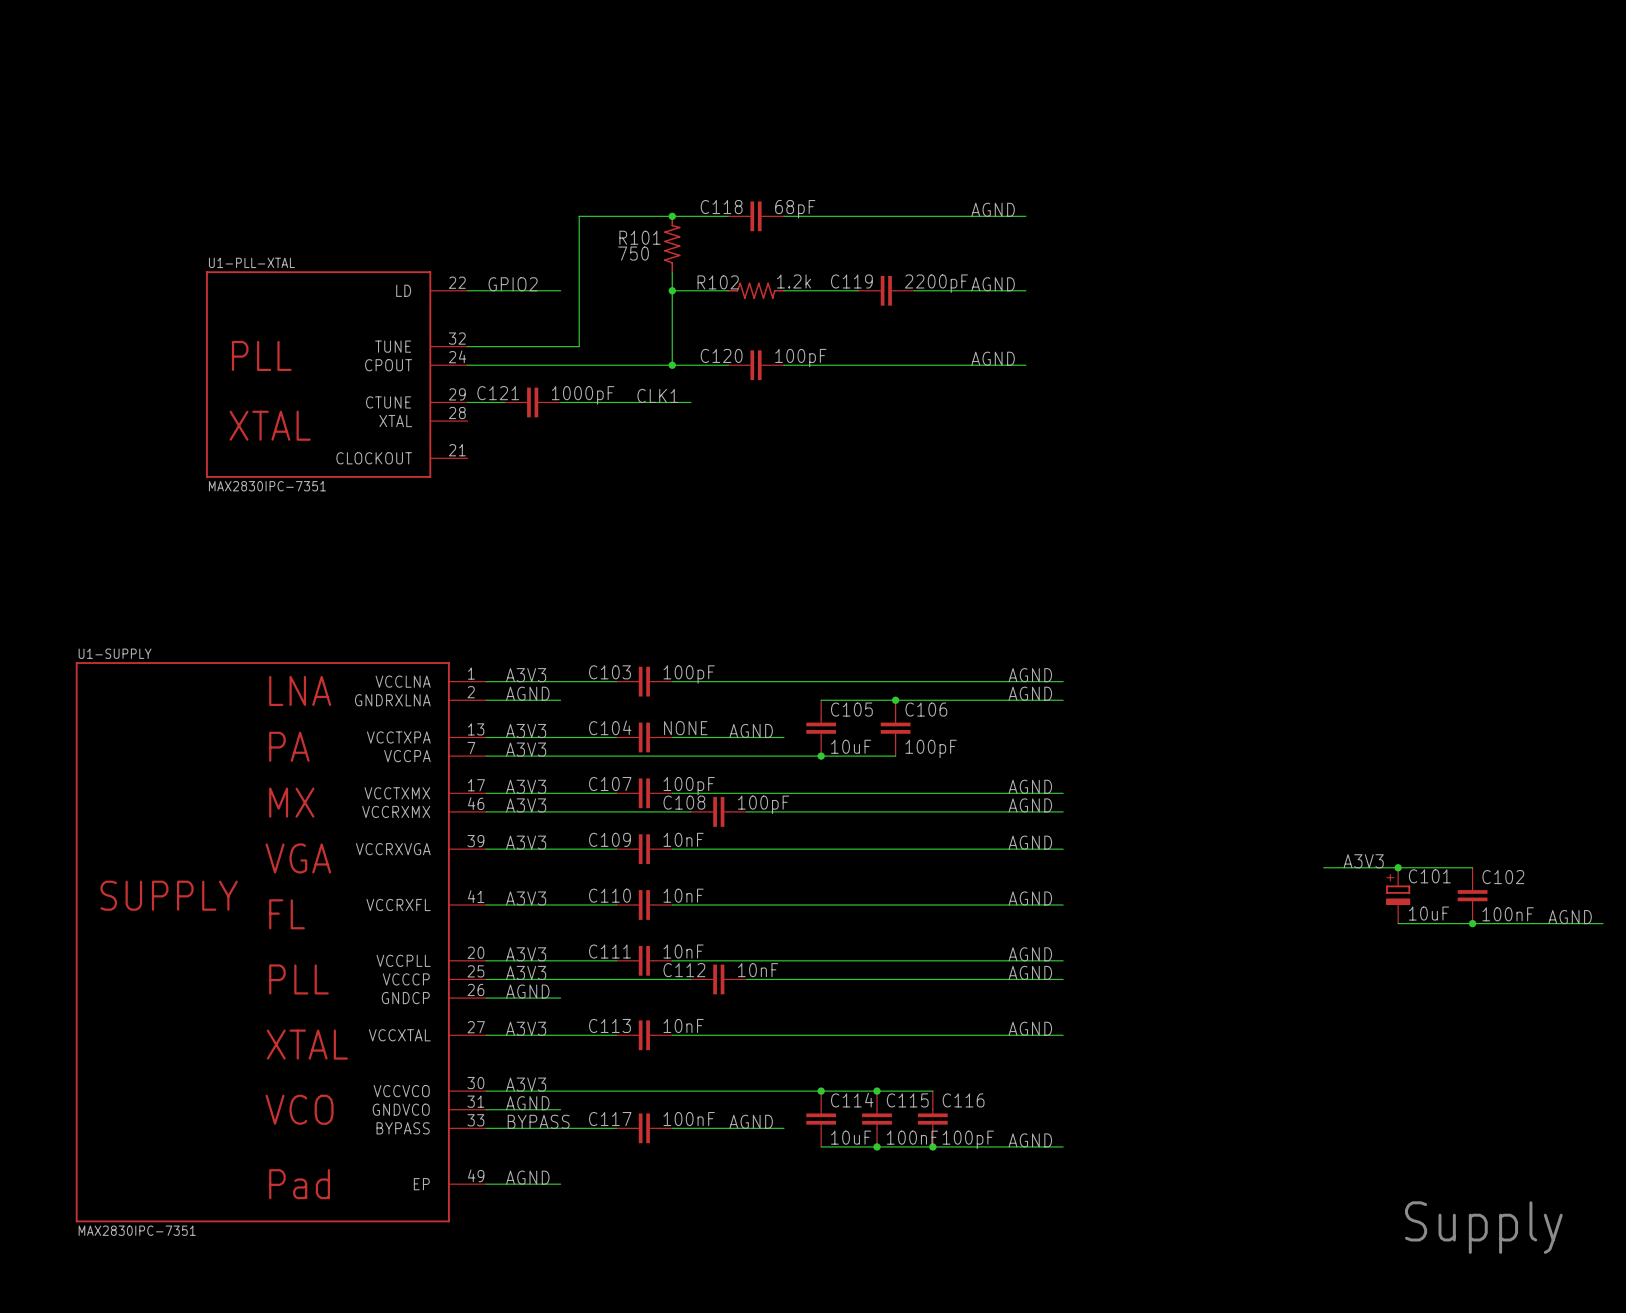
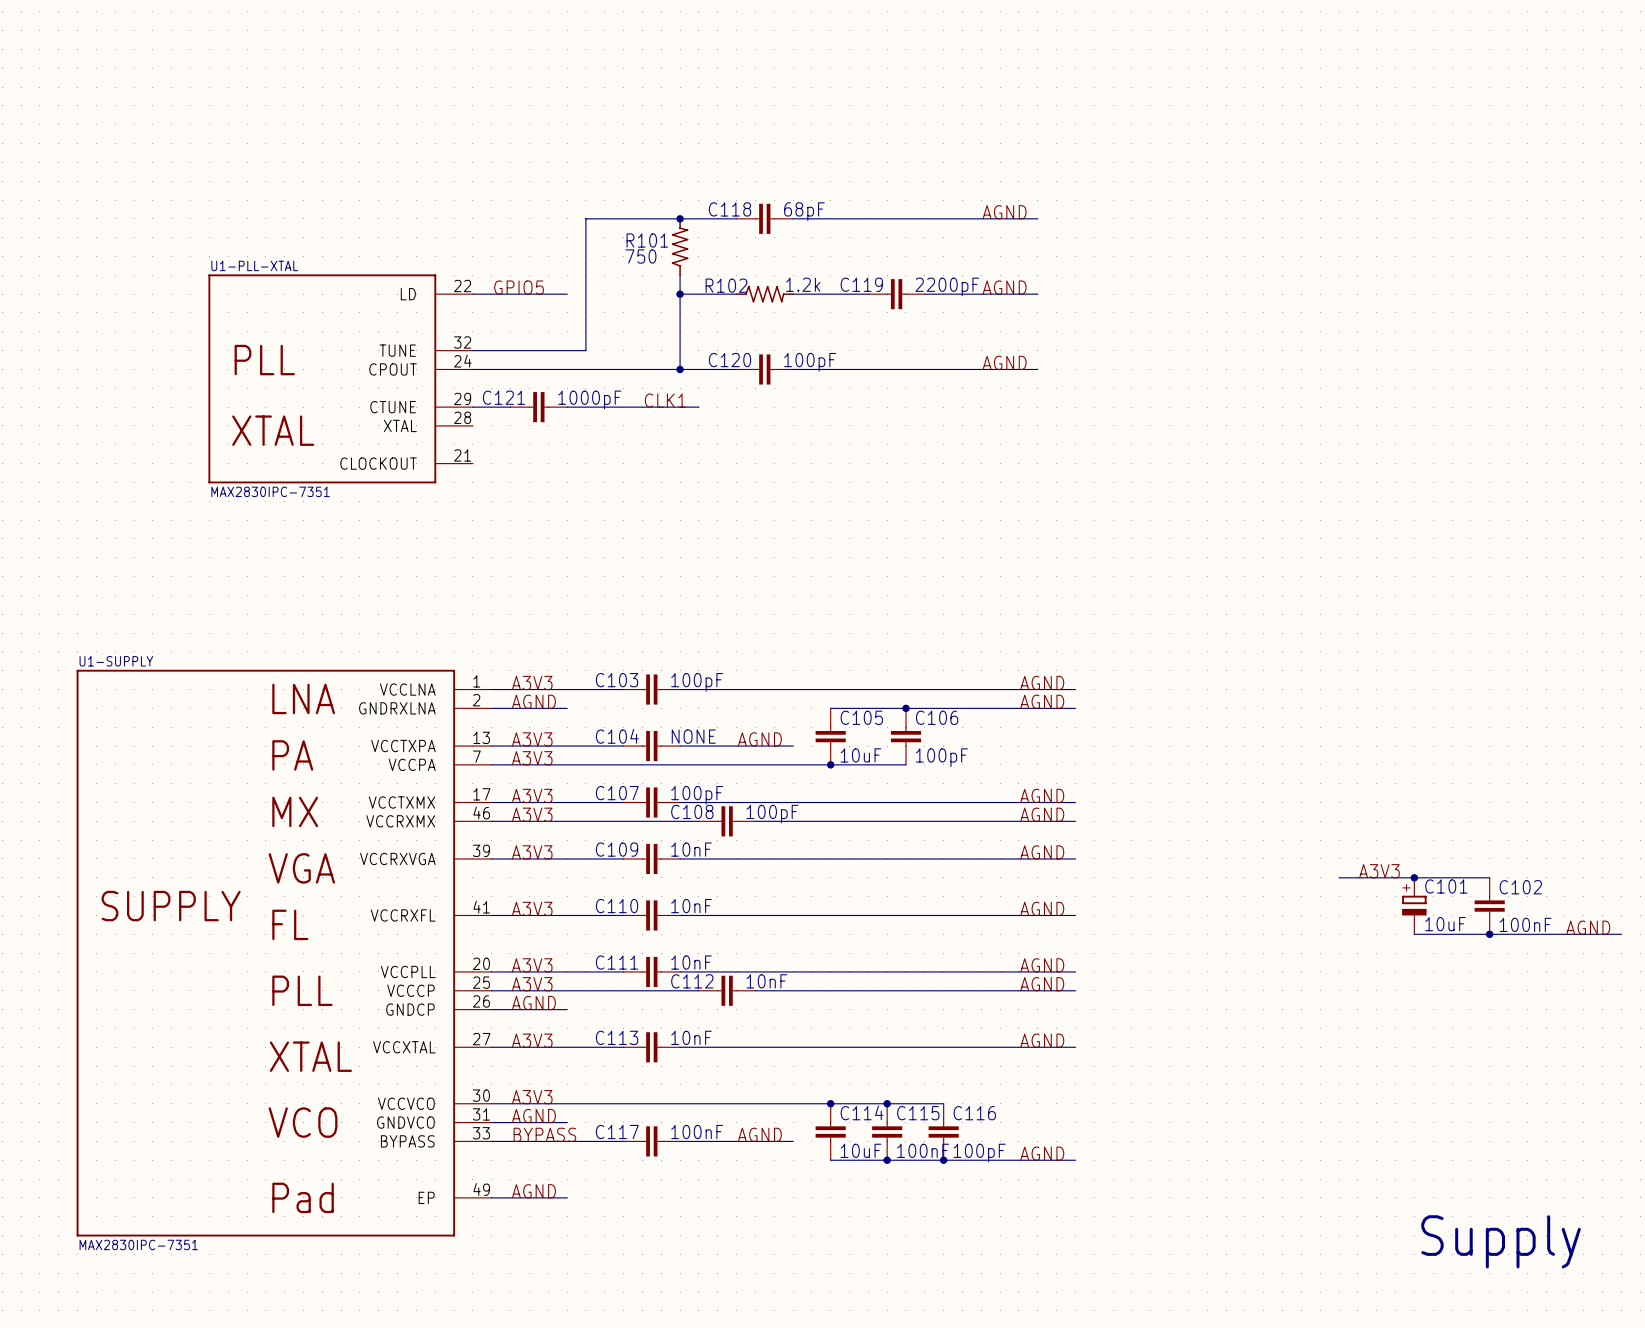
label: GPIO2 (513, 284) -> GPIO5 (519, 287)

